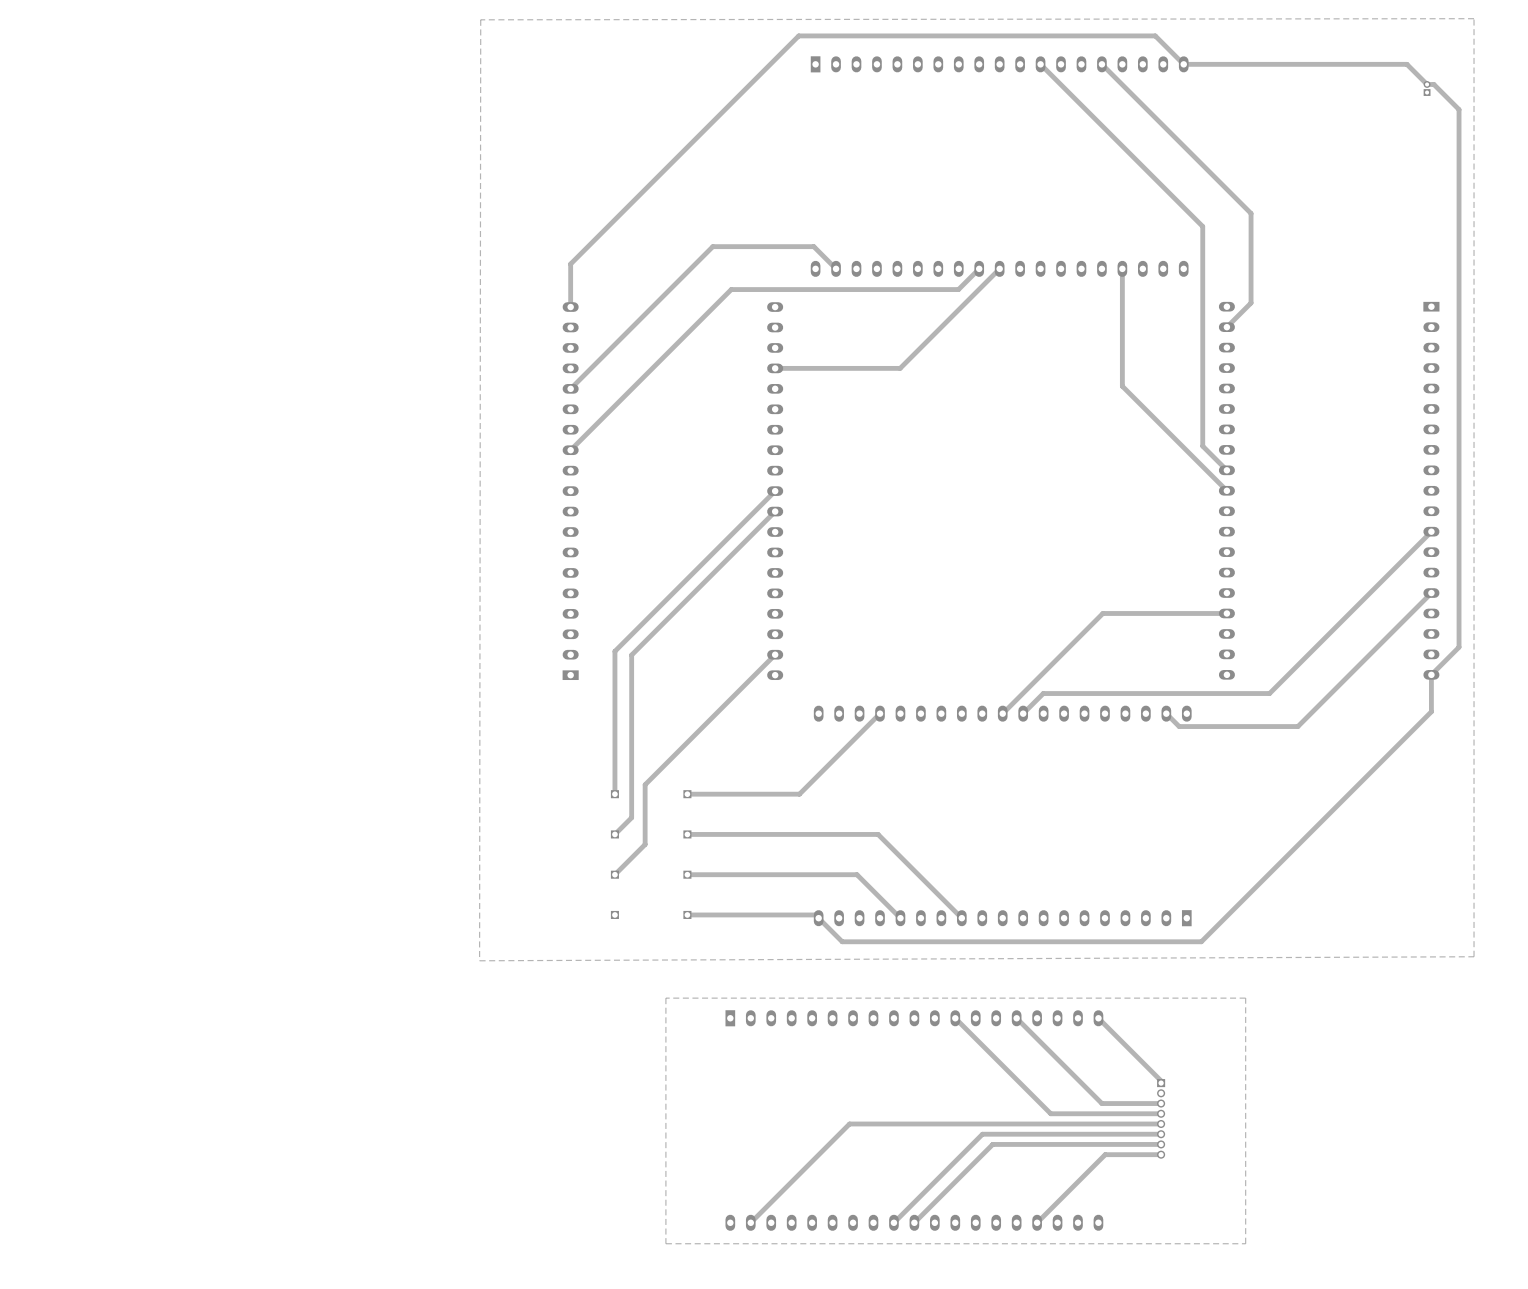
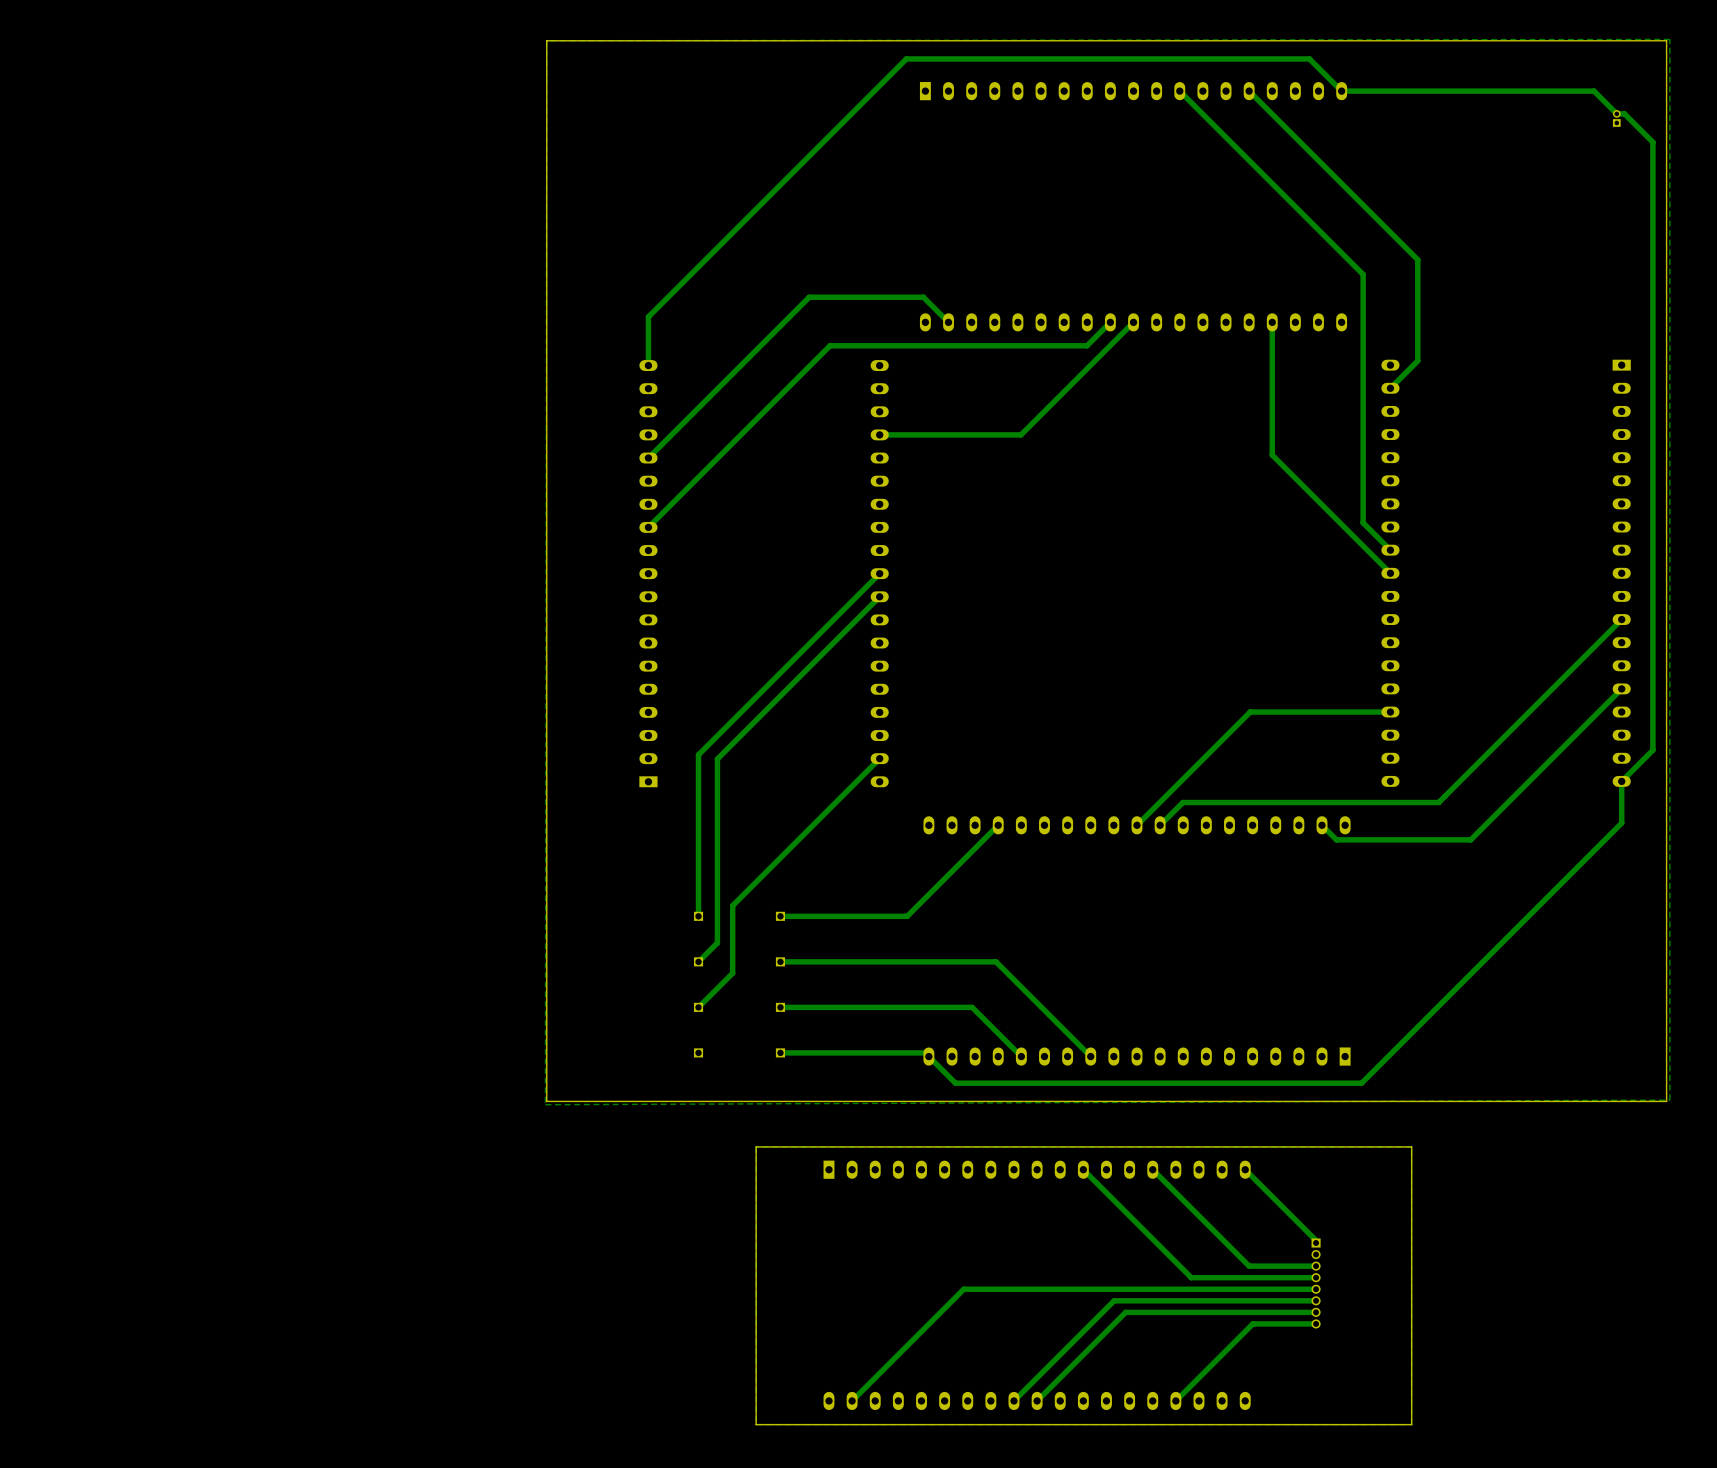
board edge: none -> (1666, 40) (546, 40) (546, 1101) (1666, 1101) (1666, 40)
board edge: none -> (1411, 1146) (756, 1146) (756, 1424) (1411, 1424) (1411, 1146)

